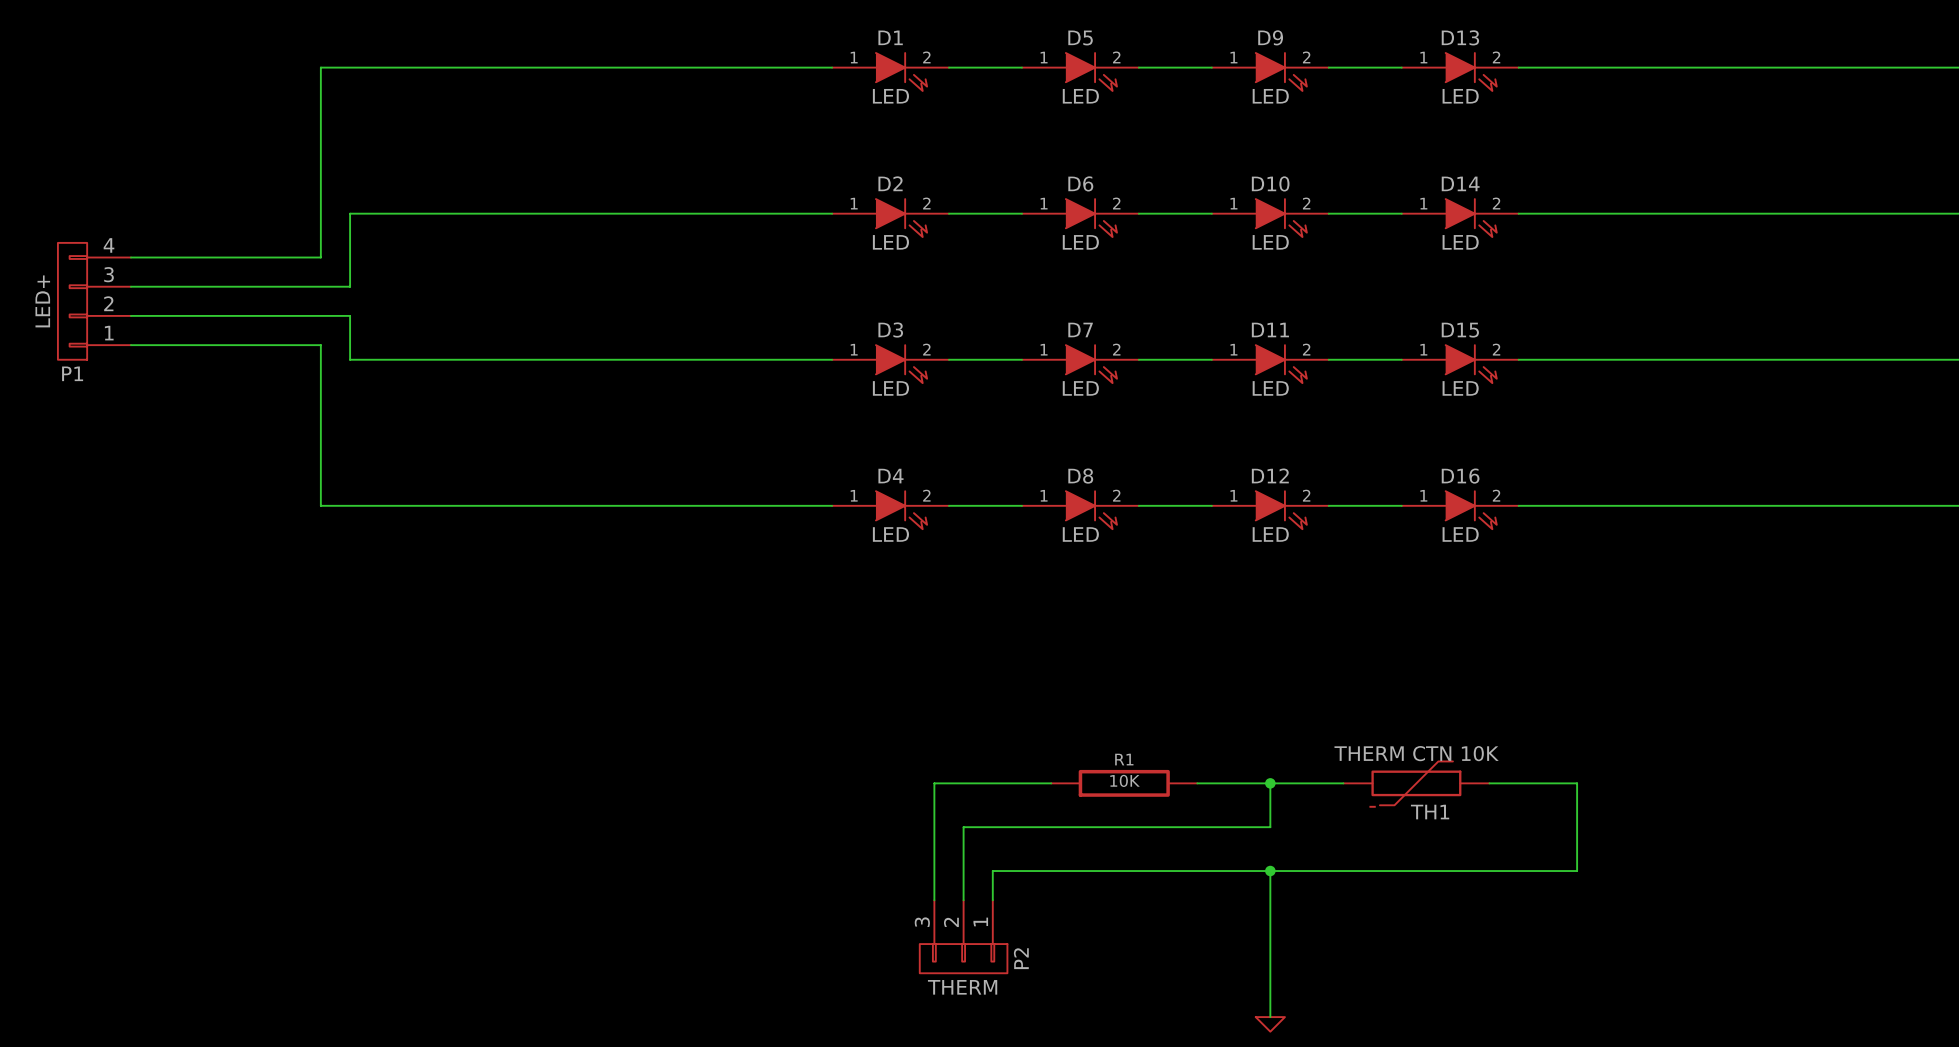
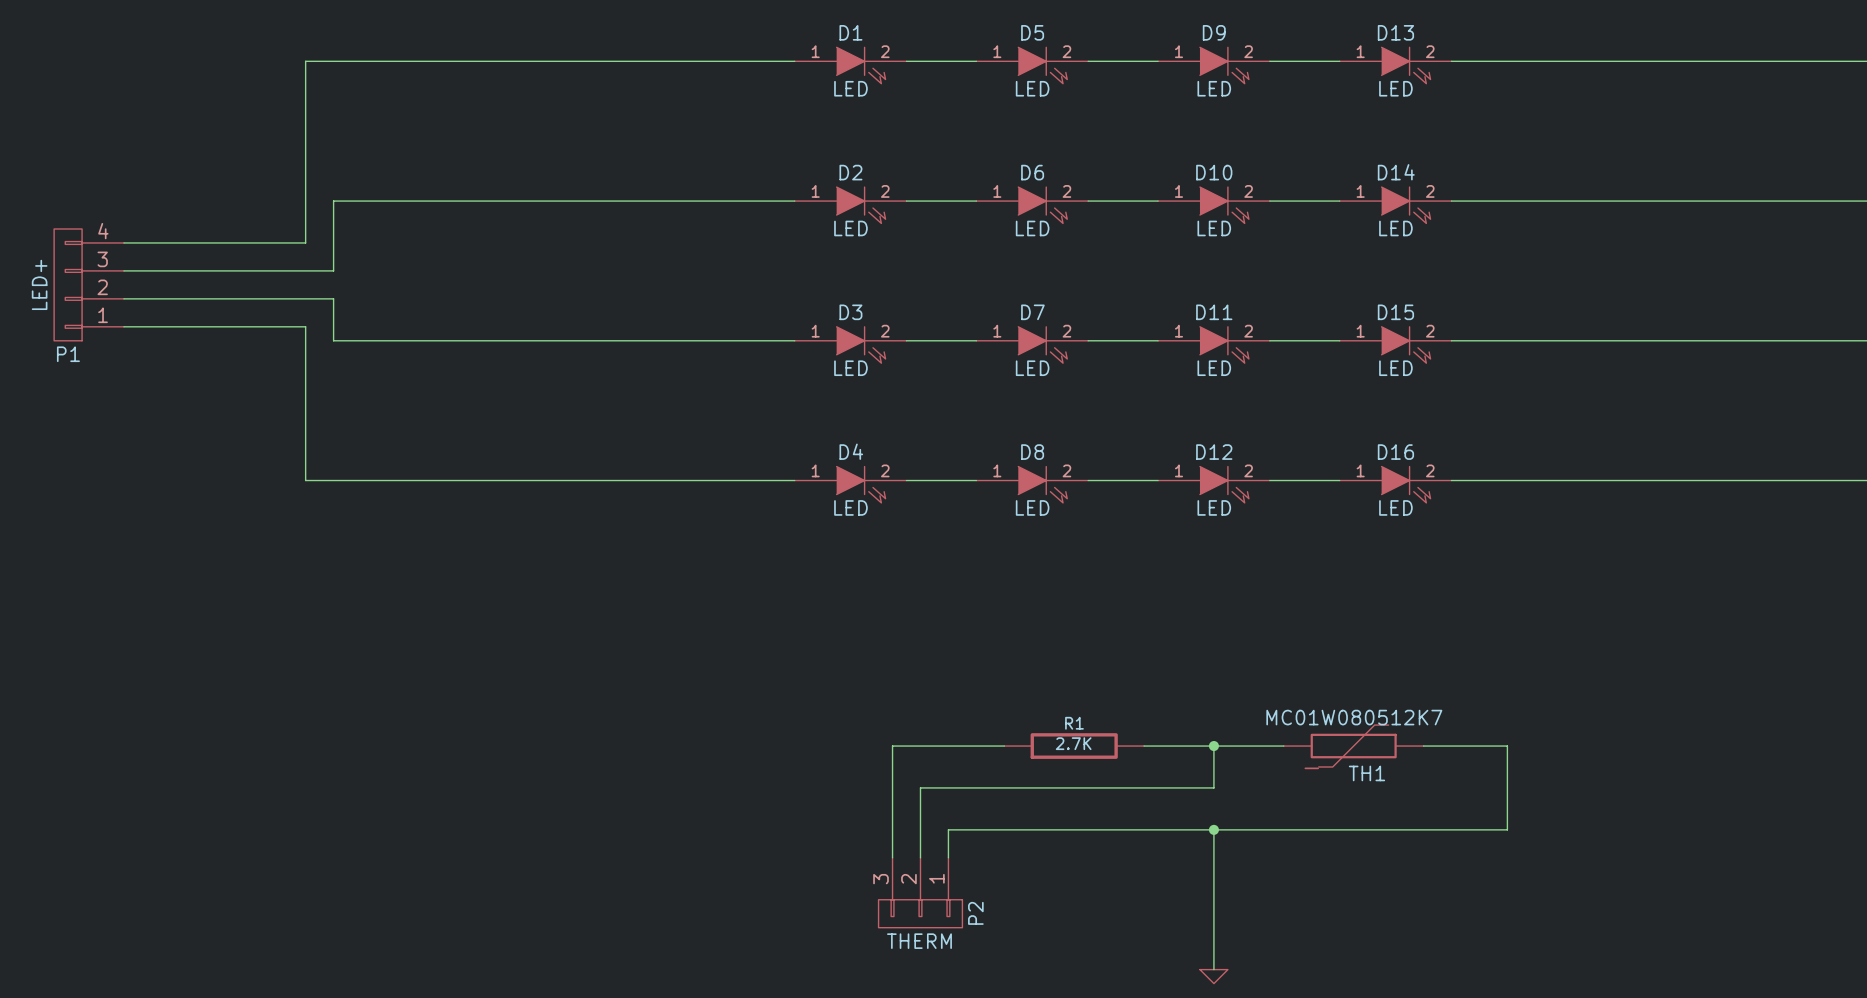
TH1 value: THERM CTN 10K (1416, 753) -> MC01W080512K7 (1354, 717)
R1 value: 10K (1125, 780) -> 2.7K (1073, 743)

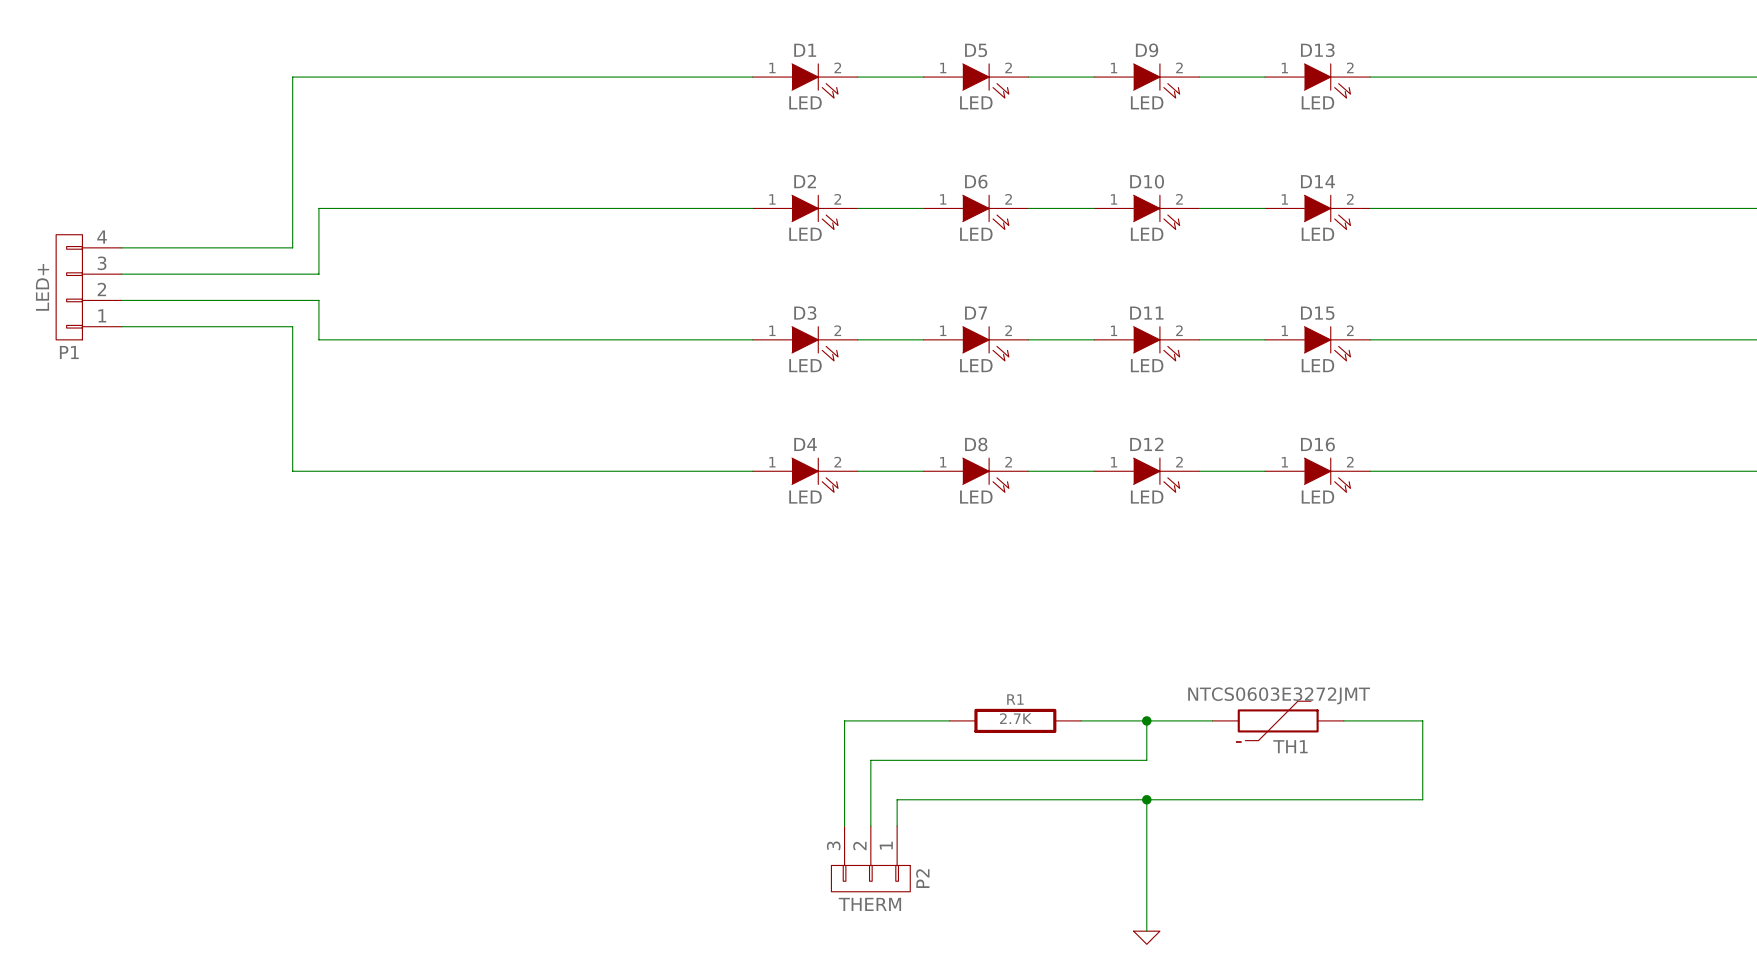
TH1 value: MC01W080512K7 (1354, 717) -> NTCS0603E3272JMT (1279, 695)

